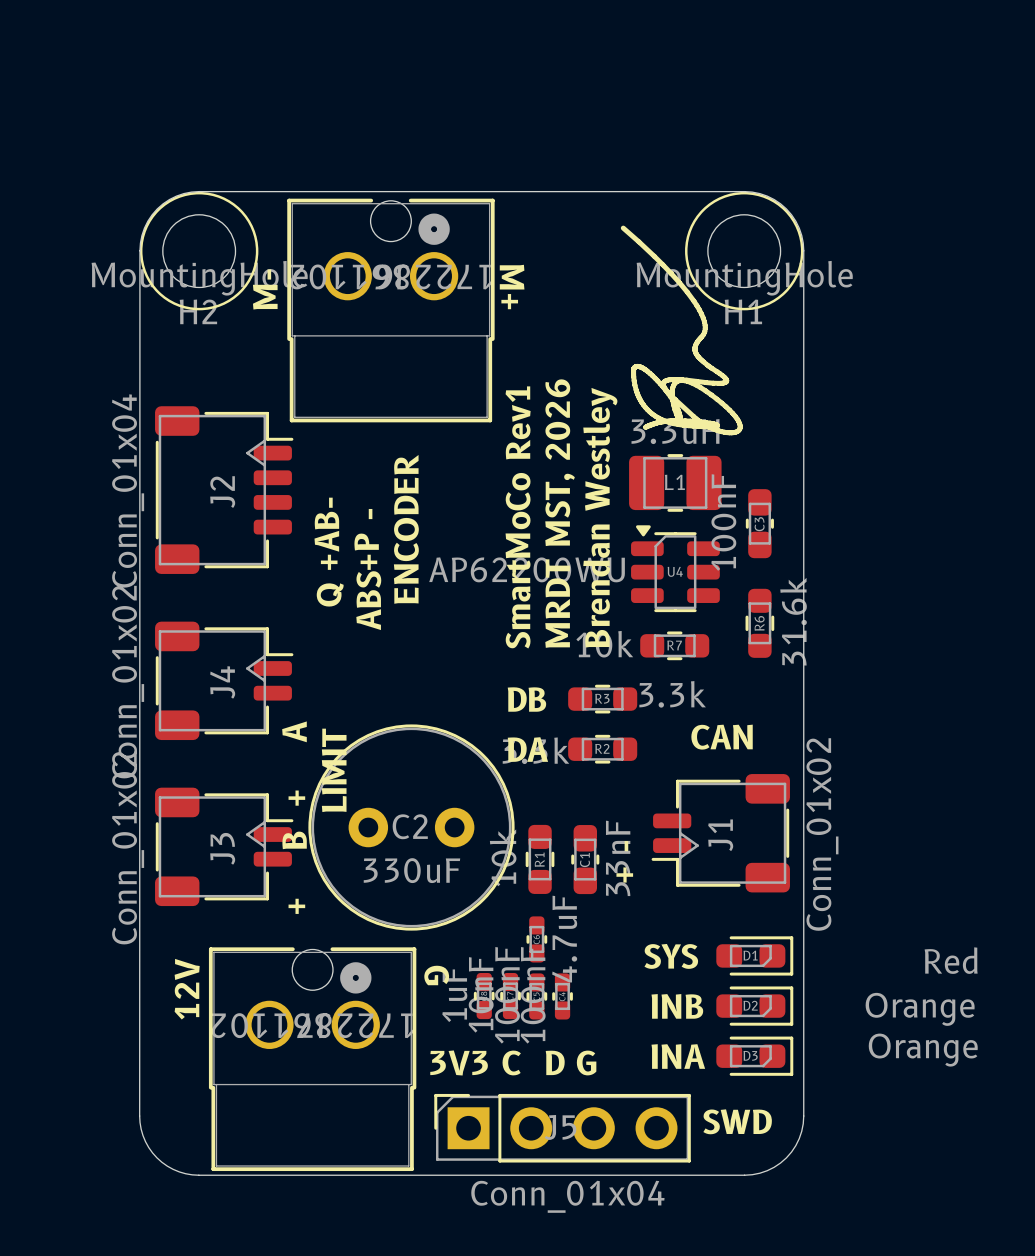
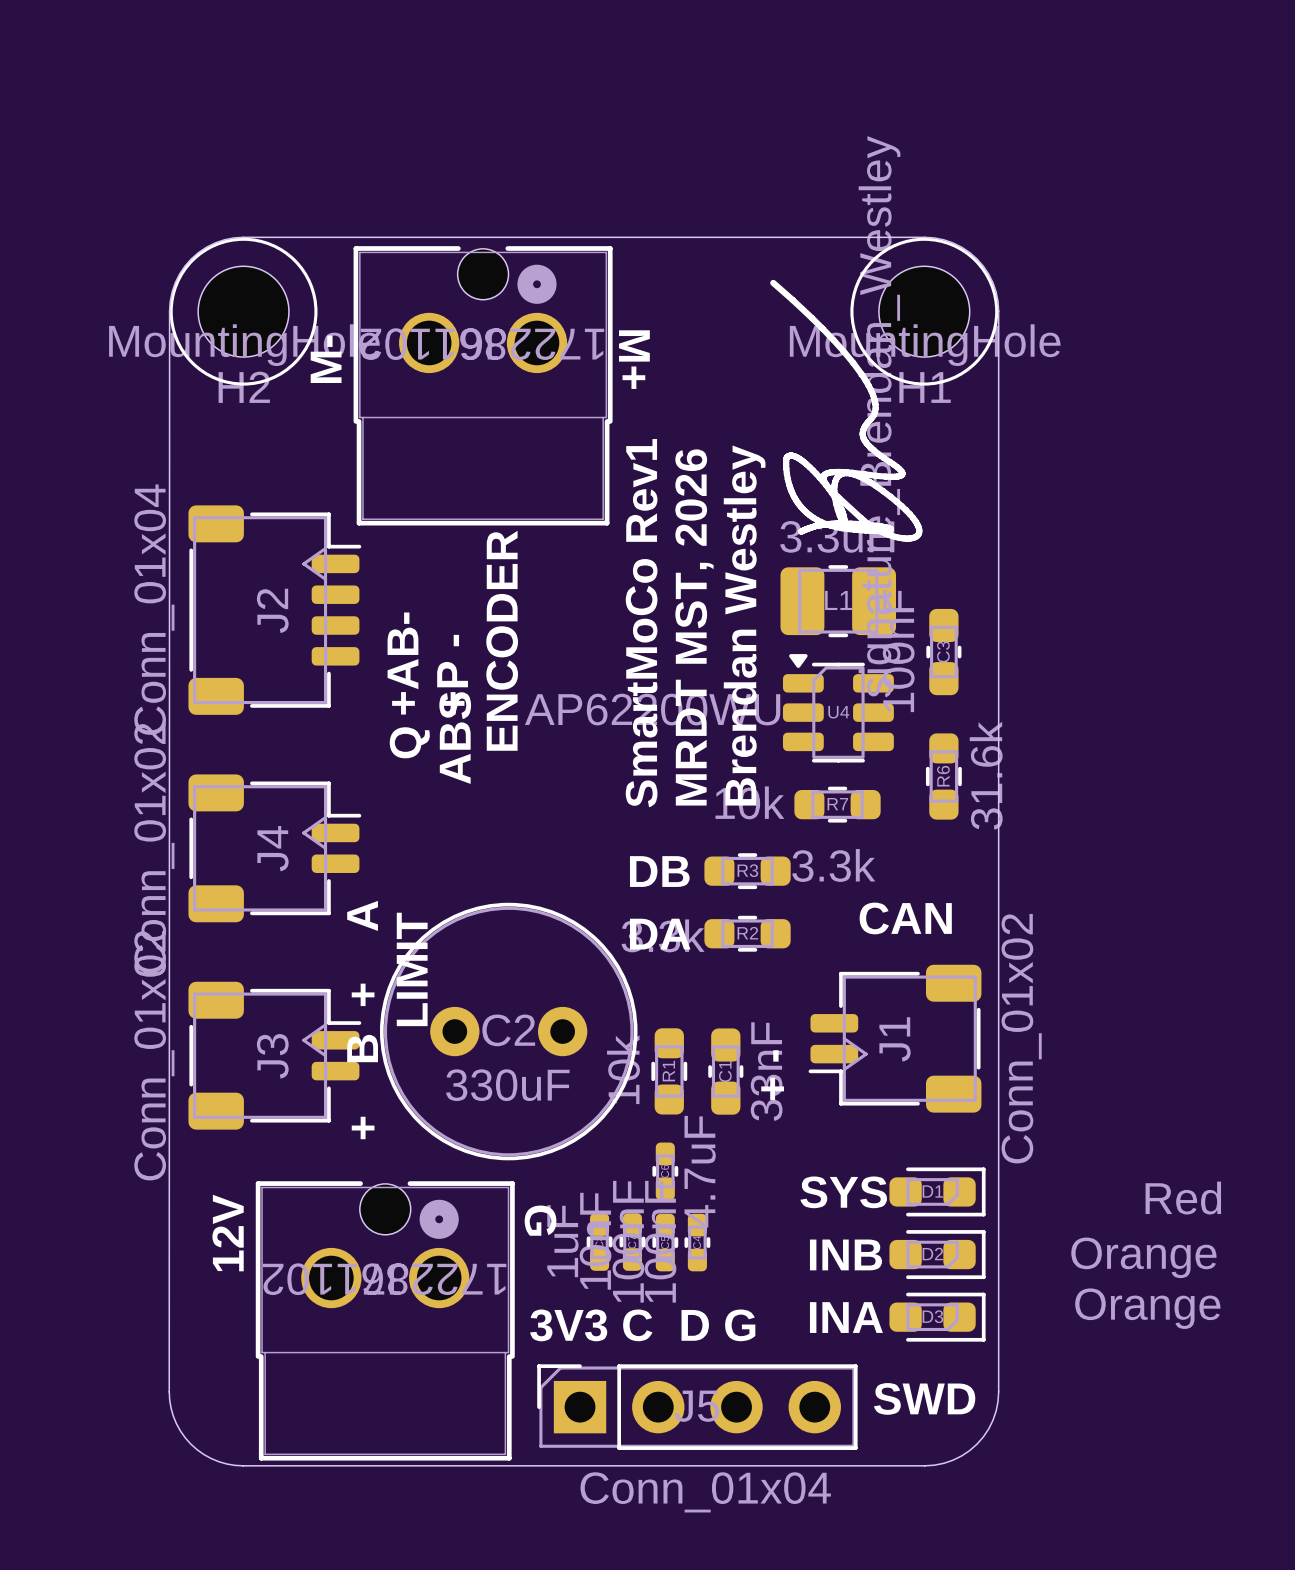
drawing shape: [620, 225, 743, 436] -> [770, 136, 923, 698]

